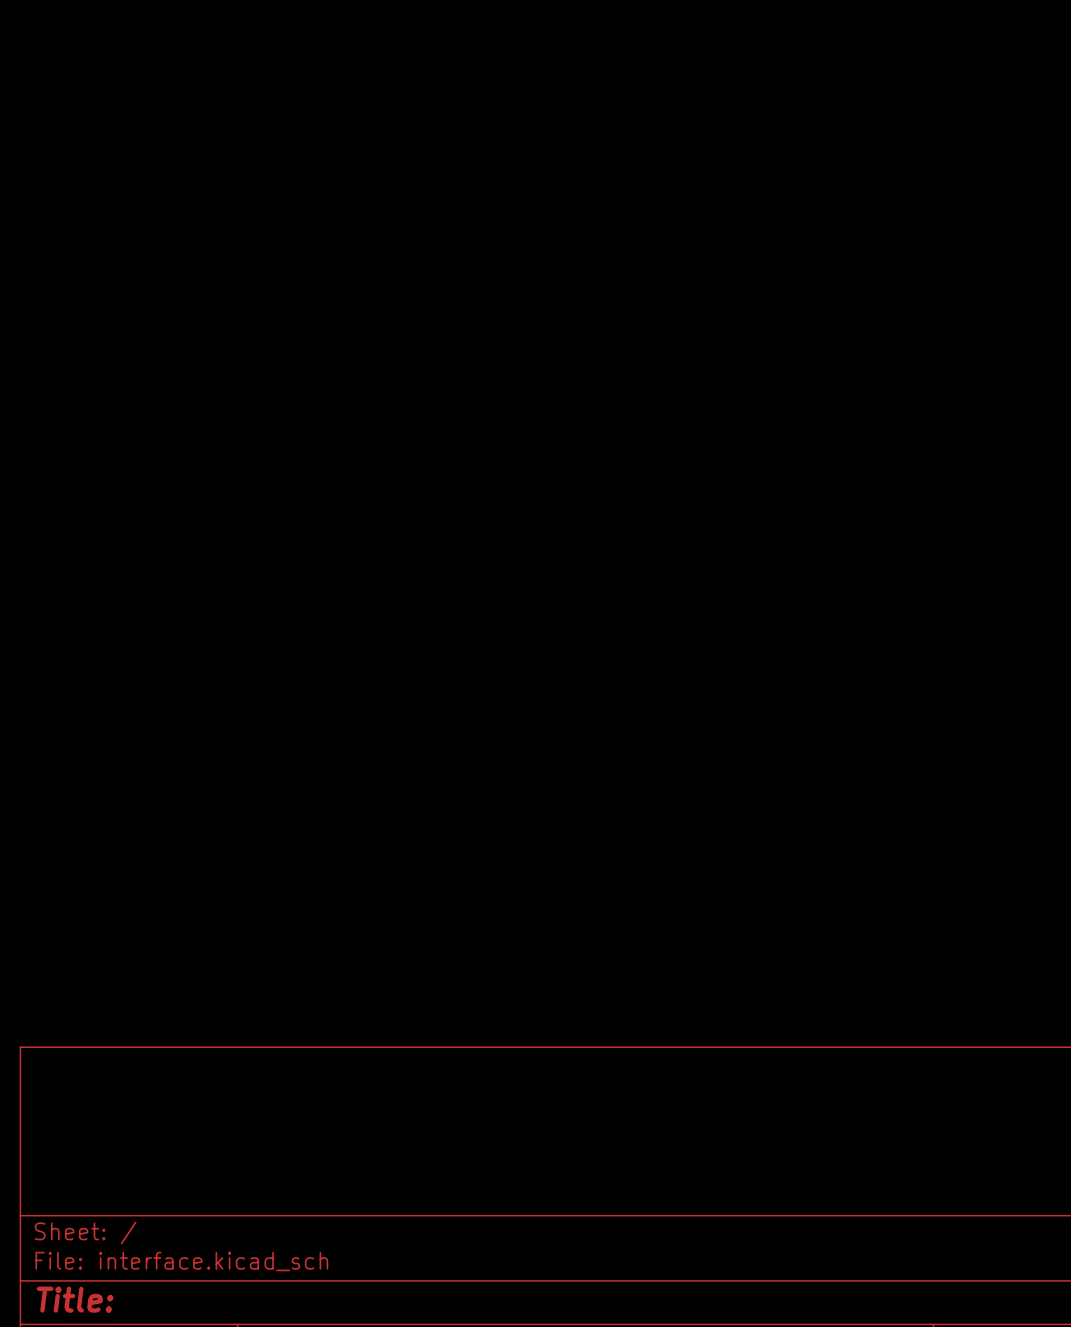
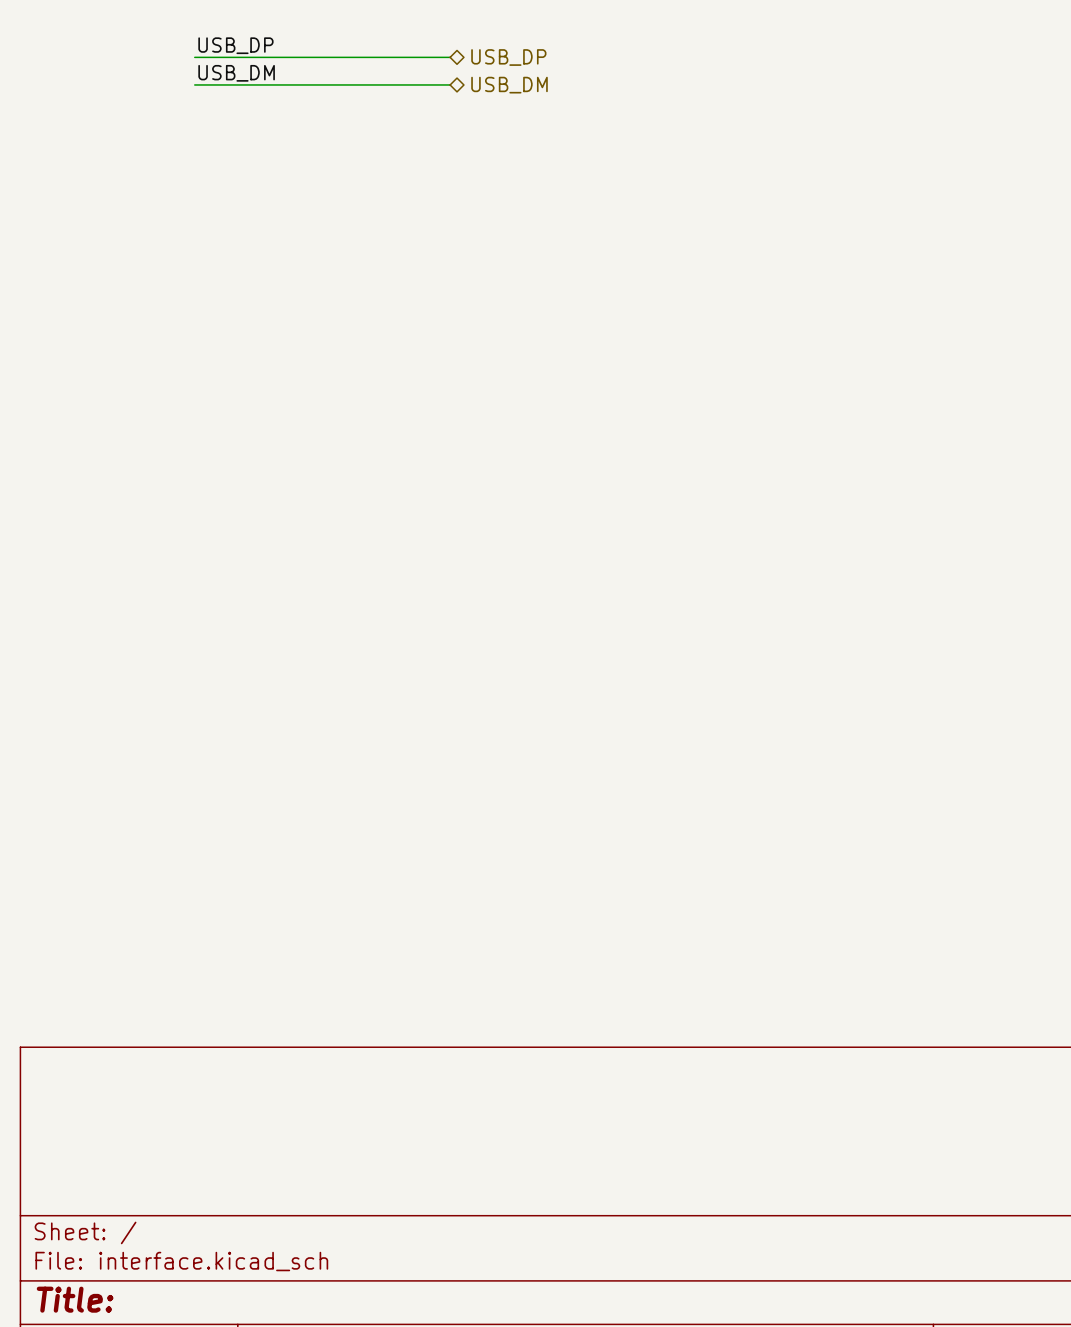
label: none -> USB_DP (235, 45)
wire: none -> (194, 57) (450, 57)
hierarchical label: none -> USB_DP (508, 57)
label: none -> USB_DM (236, 73)
wire: none -> (194, 84) (450, 84)
hierarchical label: none -> USB_DM (509, 85)

